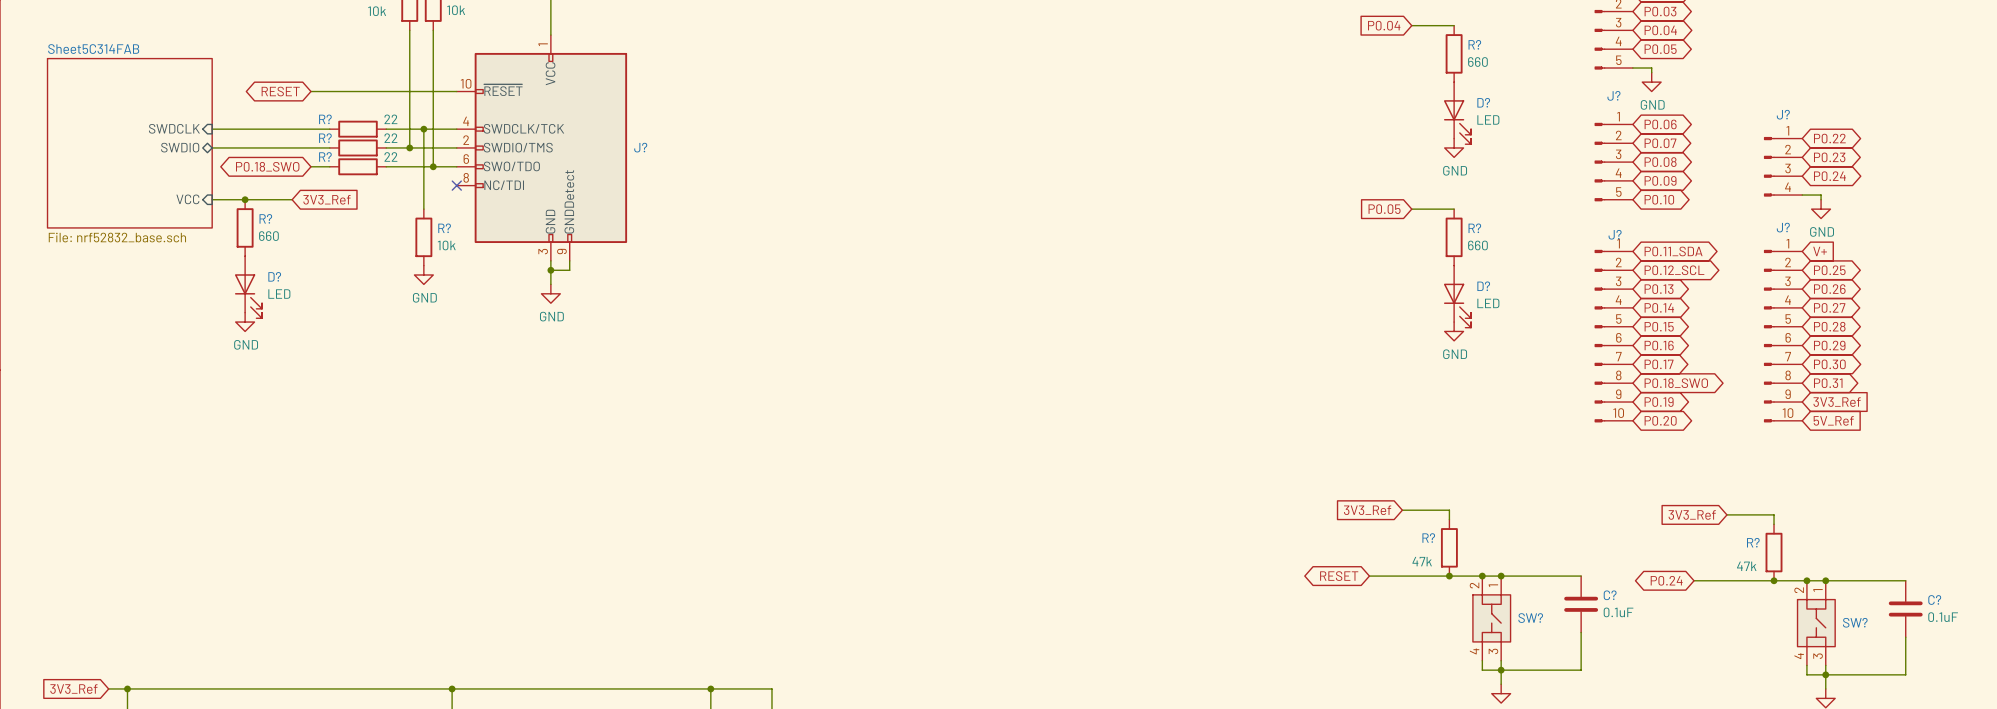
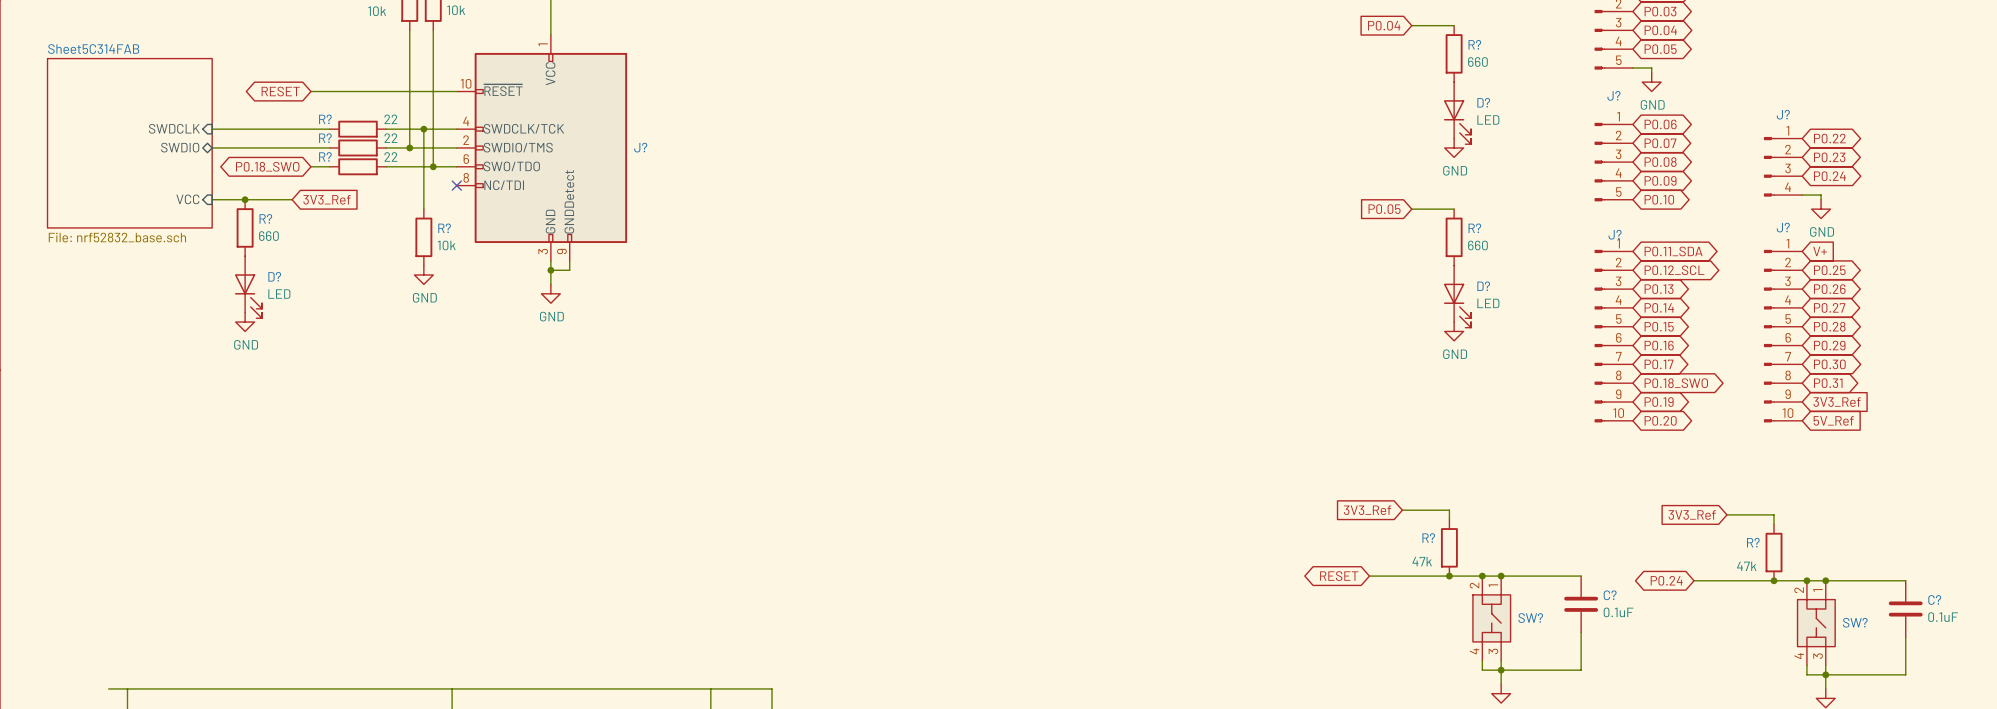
junction: (127, 688) -> none
junction: (452, 688) -> none
junction: (710, 688) -> none
global label: 3V3_Ref (73, 689) -> none

